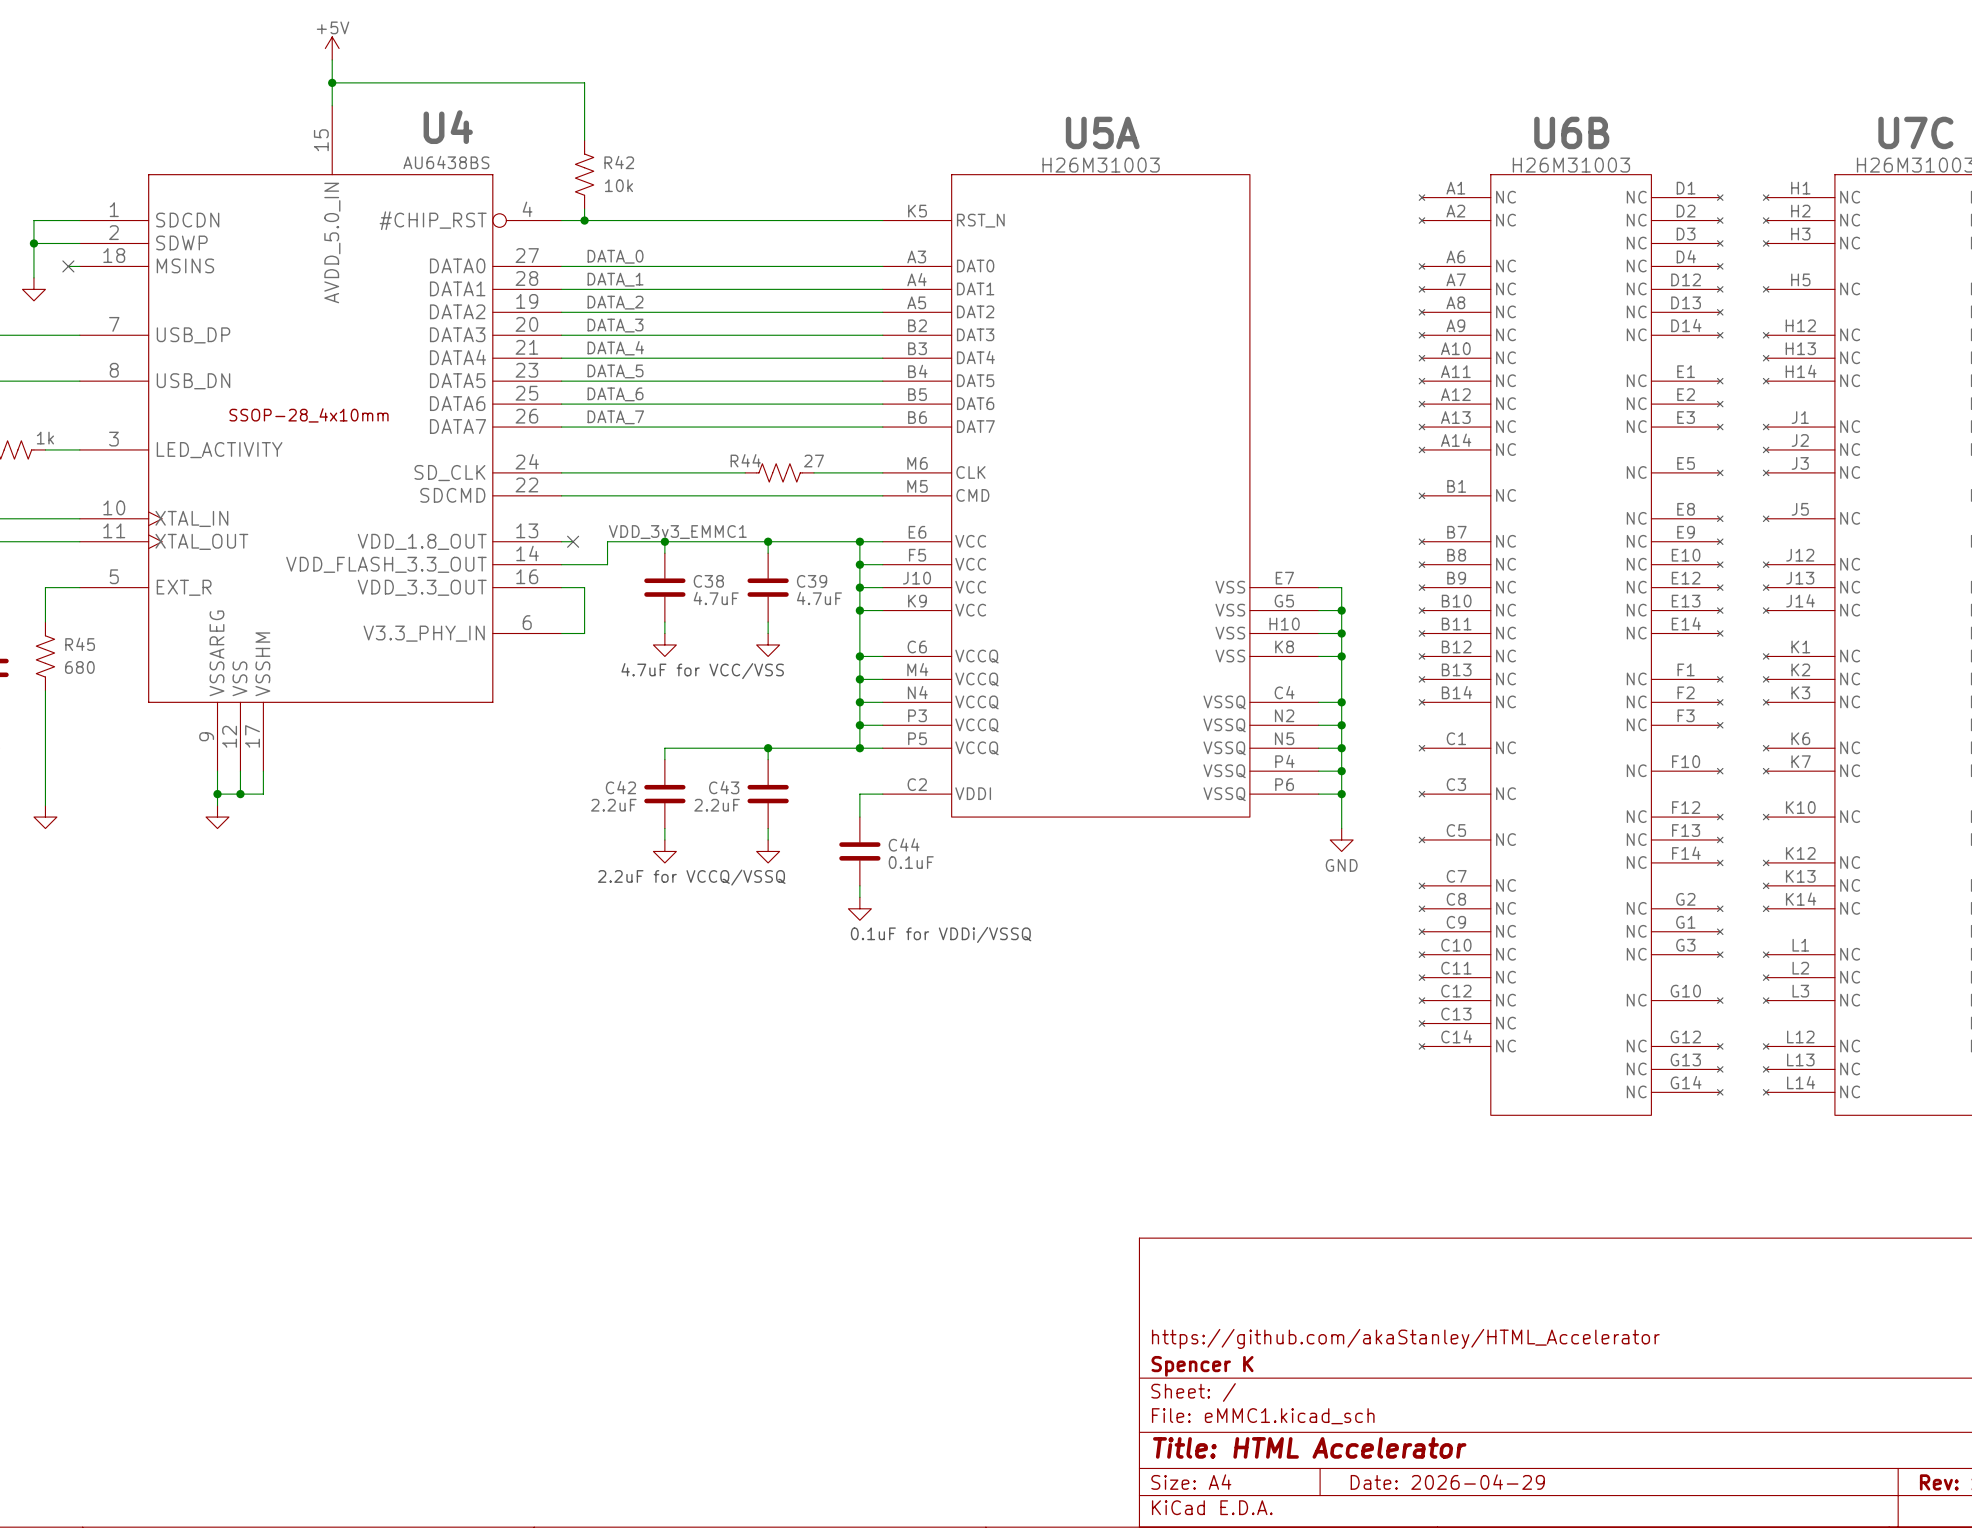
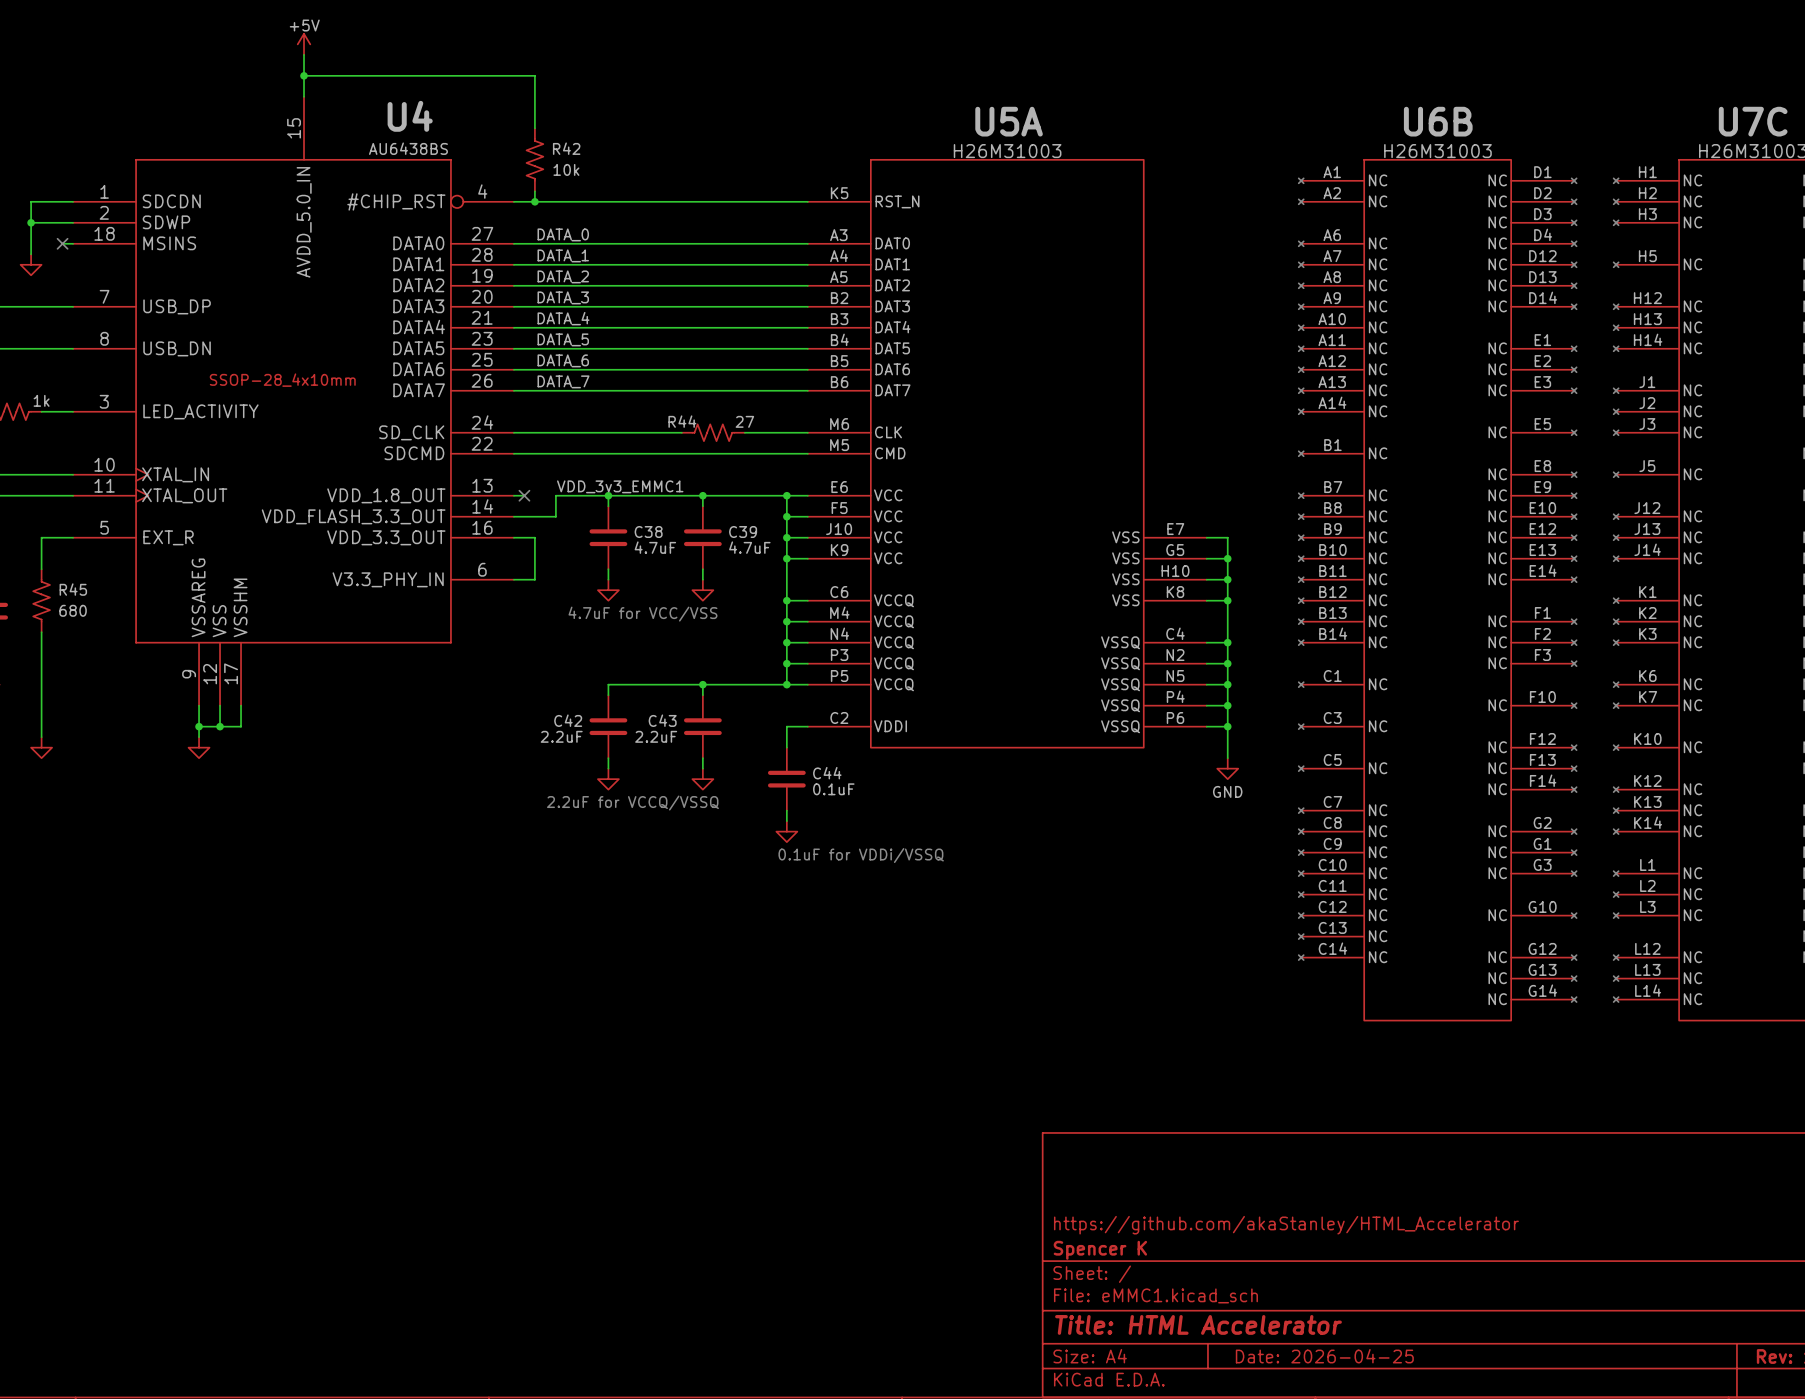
title block: Date: 2026-04-29 (1447, 1482) -> Date: 2026-04-25 (1324, 1356)

